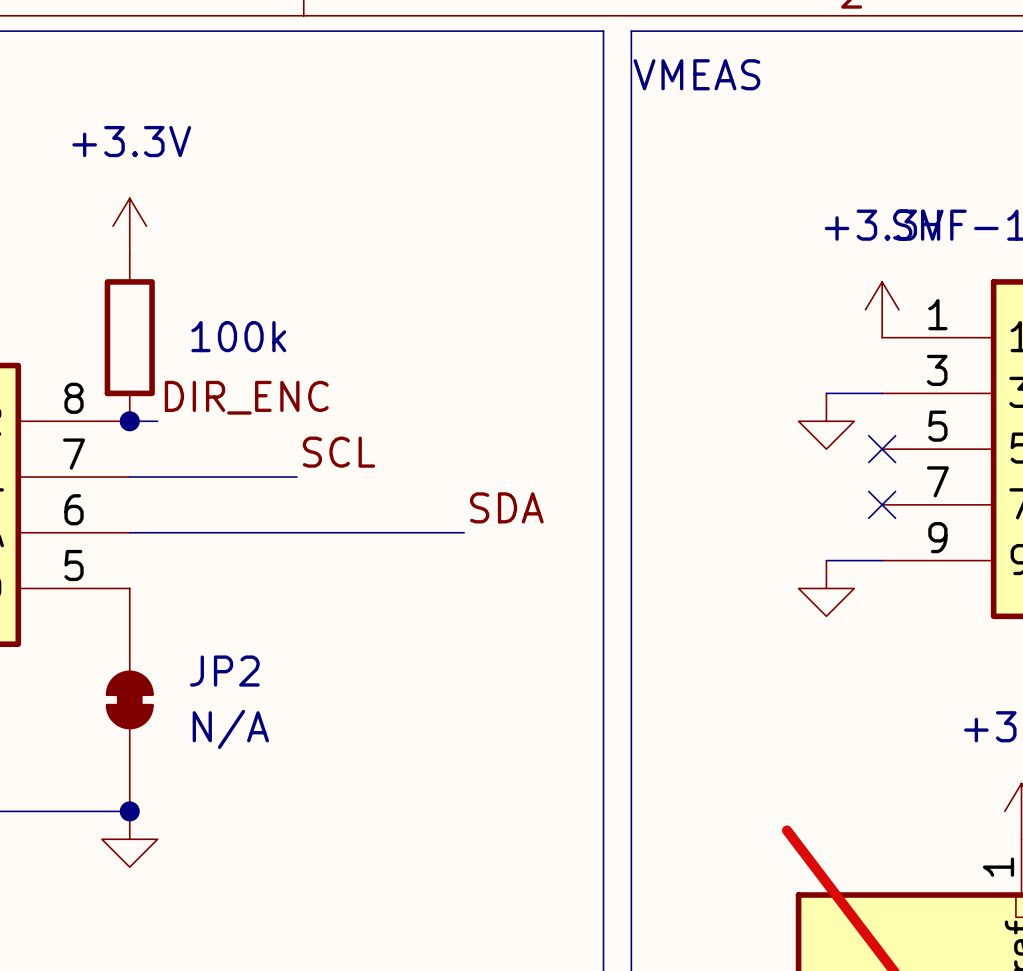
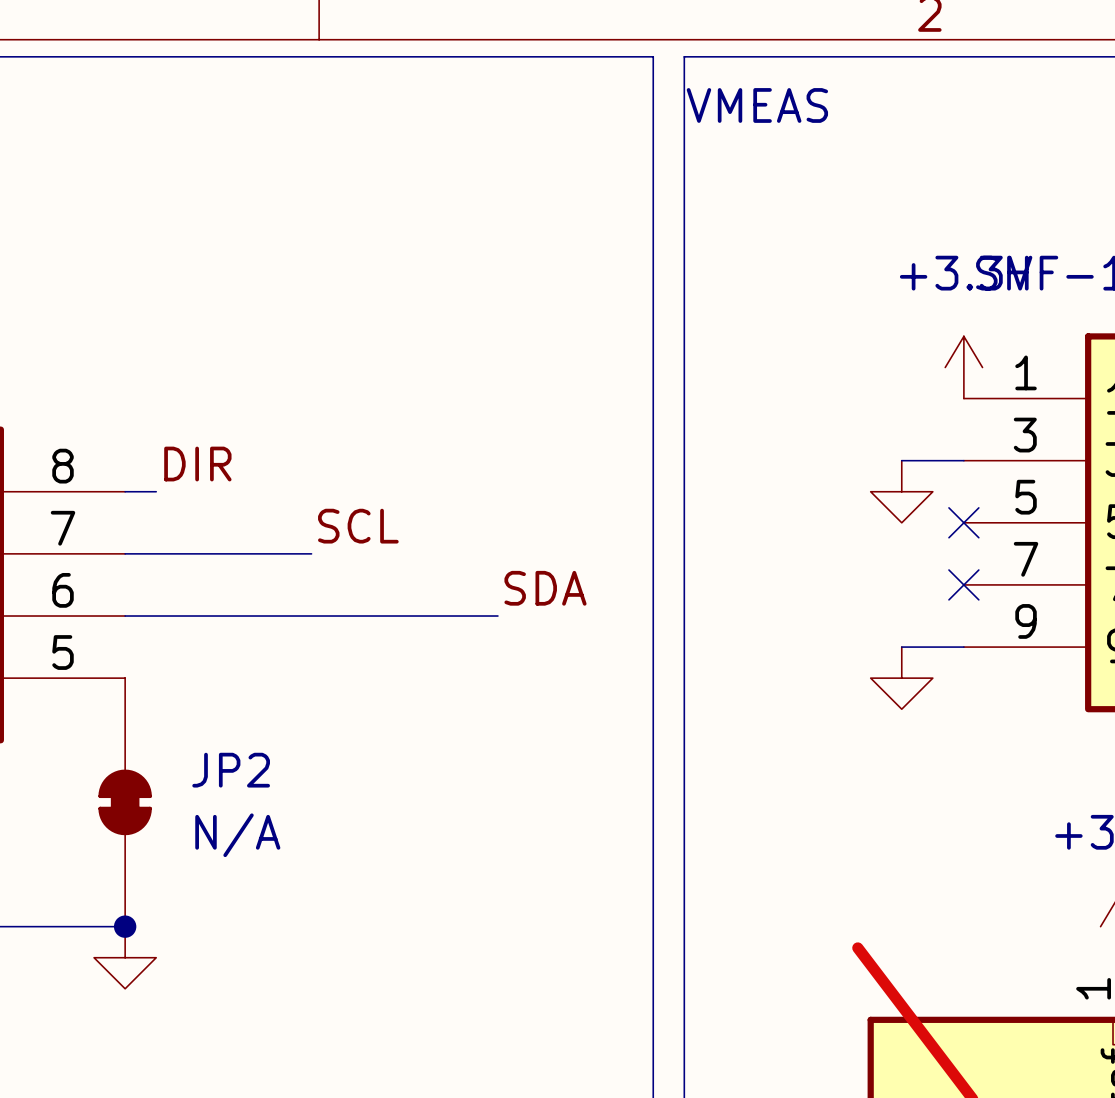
power symbol: +3.3V (129, 226) -> none
part: 100k (129, 337) -> none
label: DIR_ENC (246, 397) -> DIR (197, 464)
junction: (129, 421) -> none

